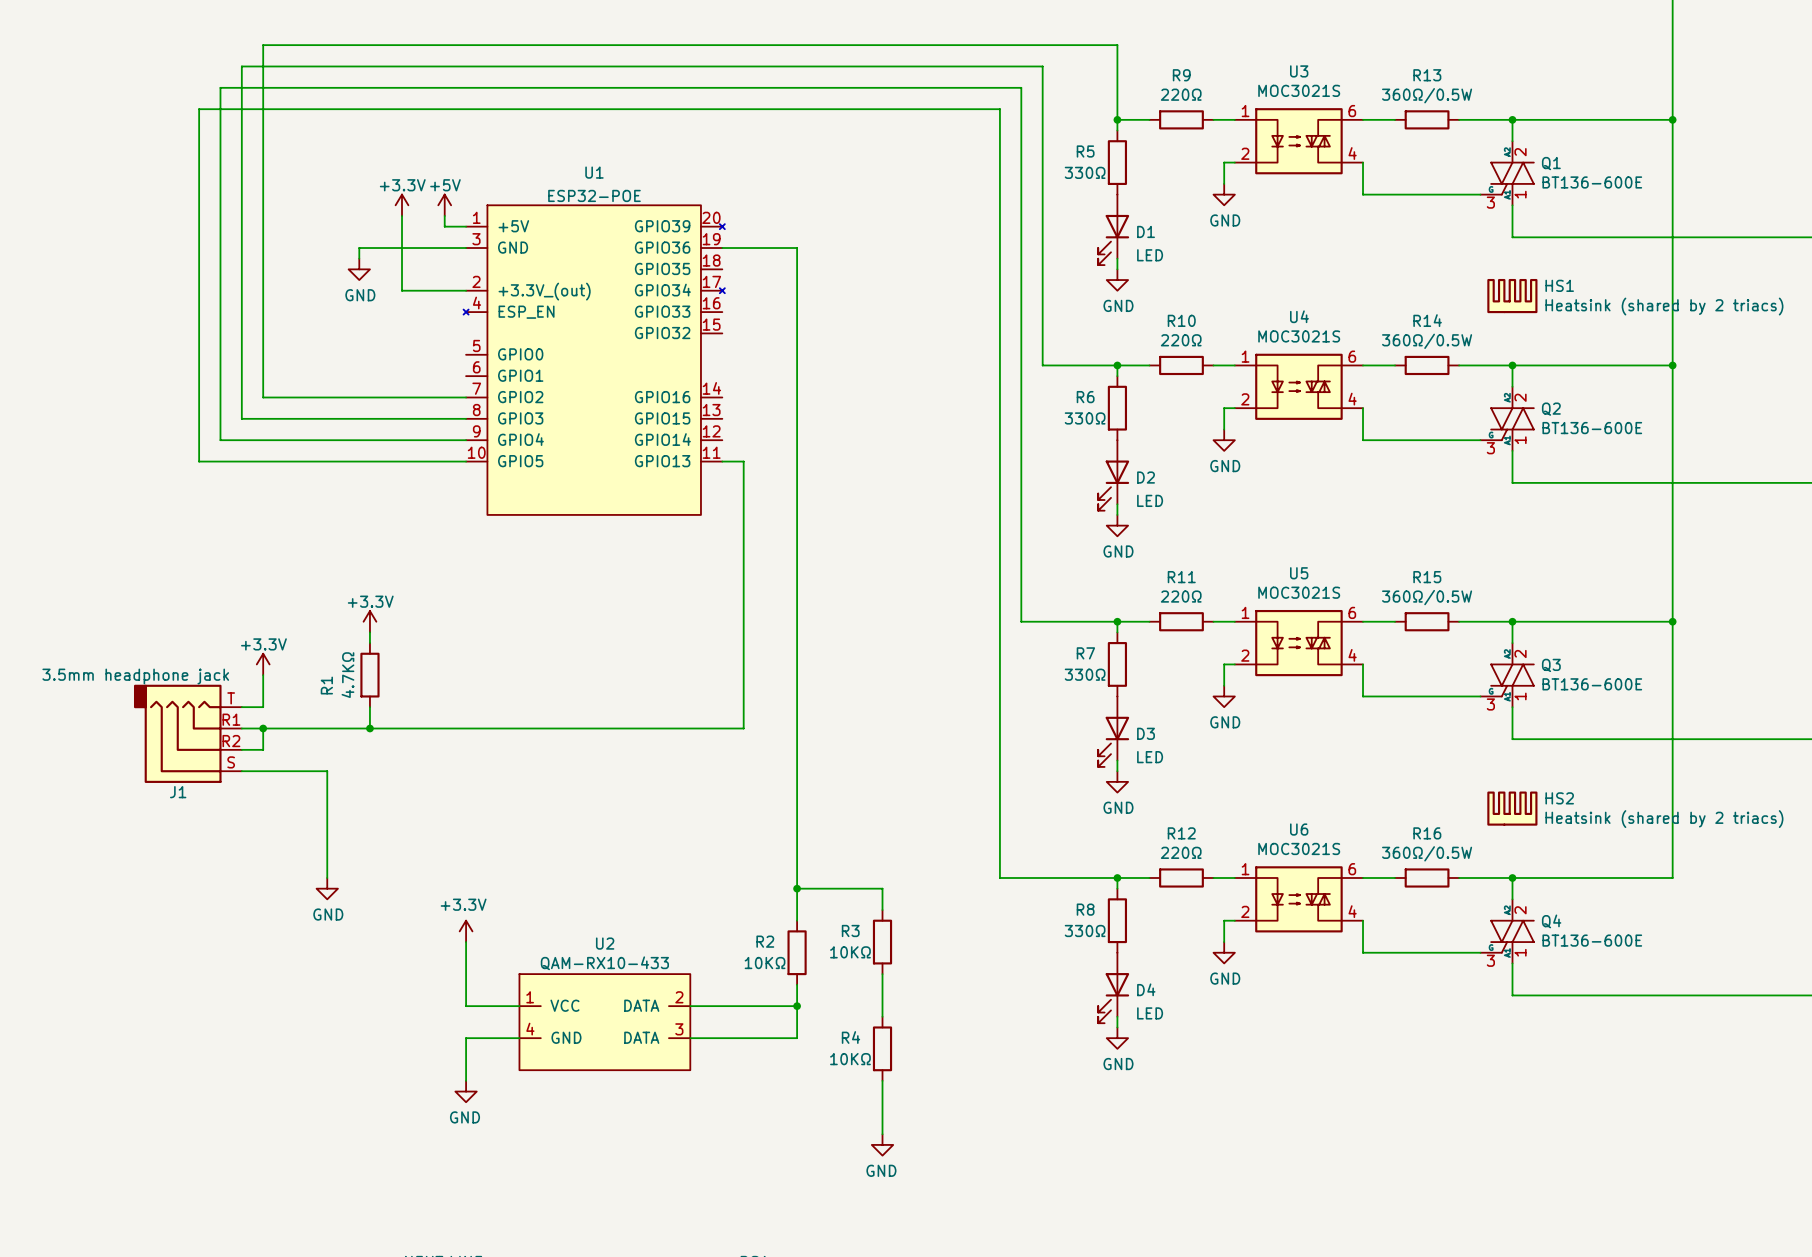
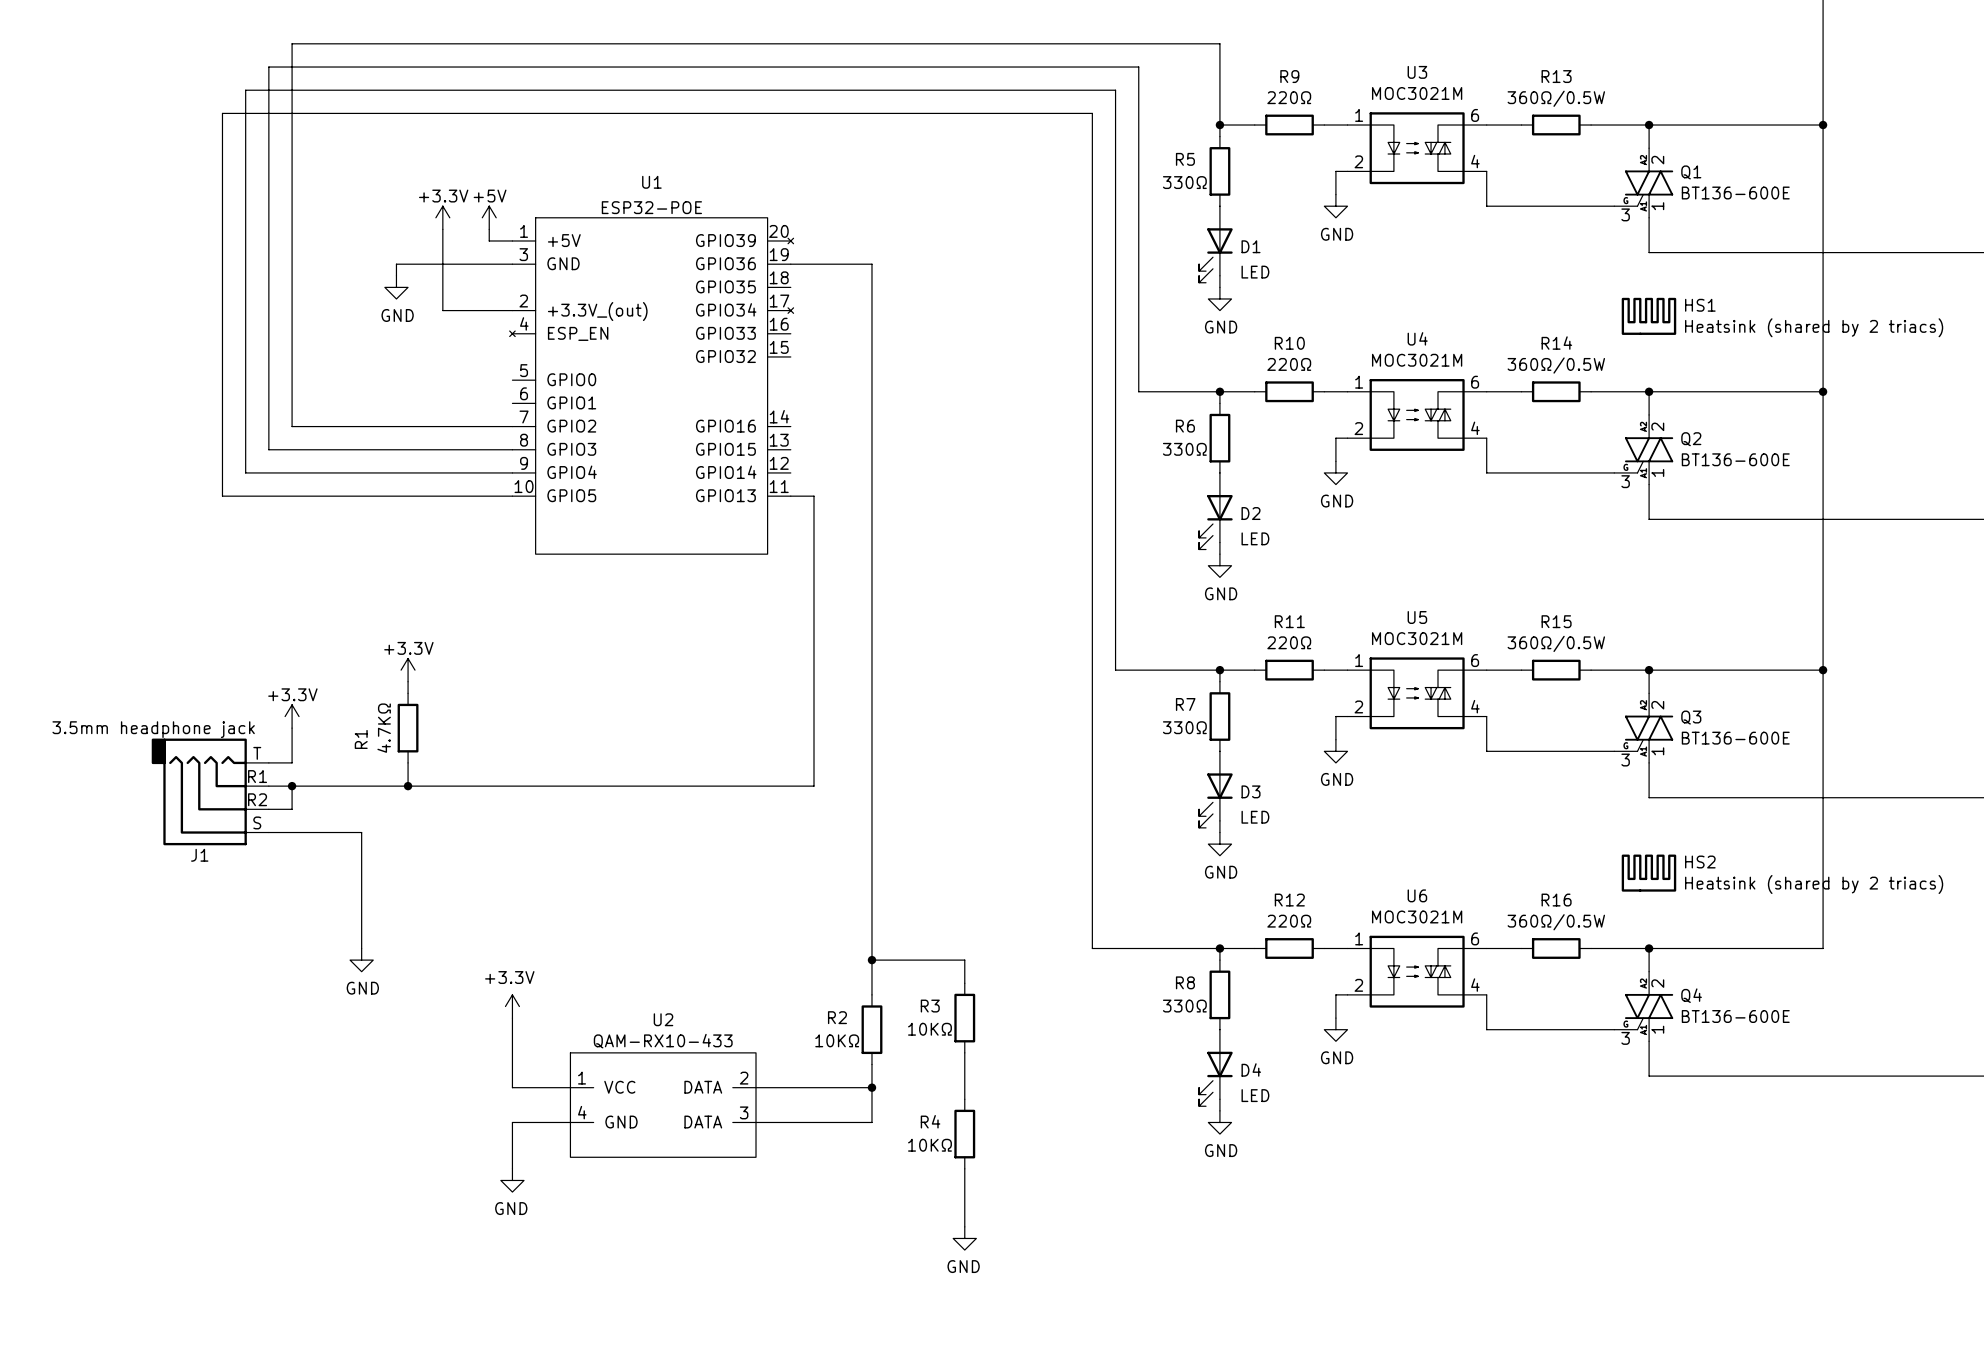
U3 value: MOC3021S (1299, 90) -> MOC3021M (1417, 93)
U4 value: MOC3021S (1299, 336) -> MOC3021M (1417, 360)
U5 value: MOC3021S (1299, 592) -> MOC3021M (1417, 638)
U6 value: MOC3021S (1299, 848) -> MOC3021M (1417, 916)

